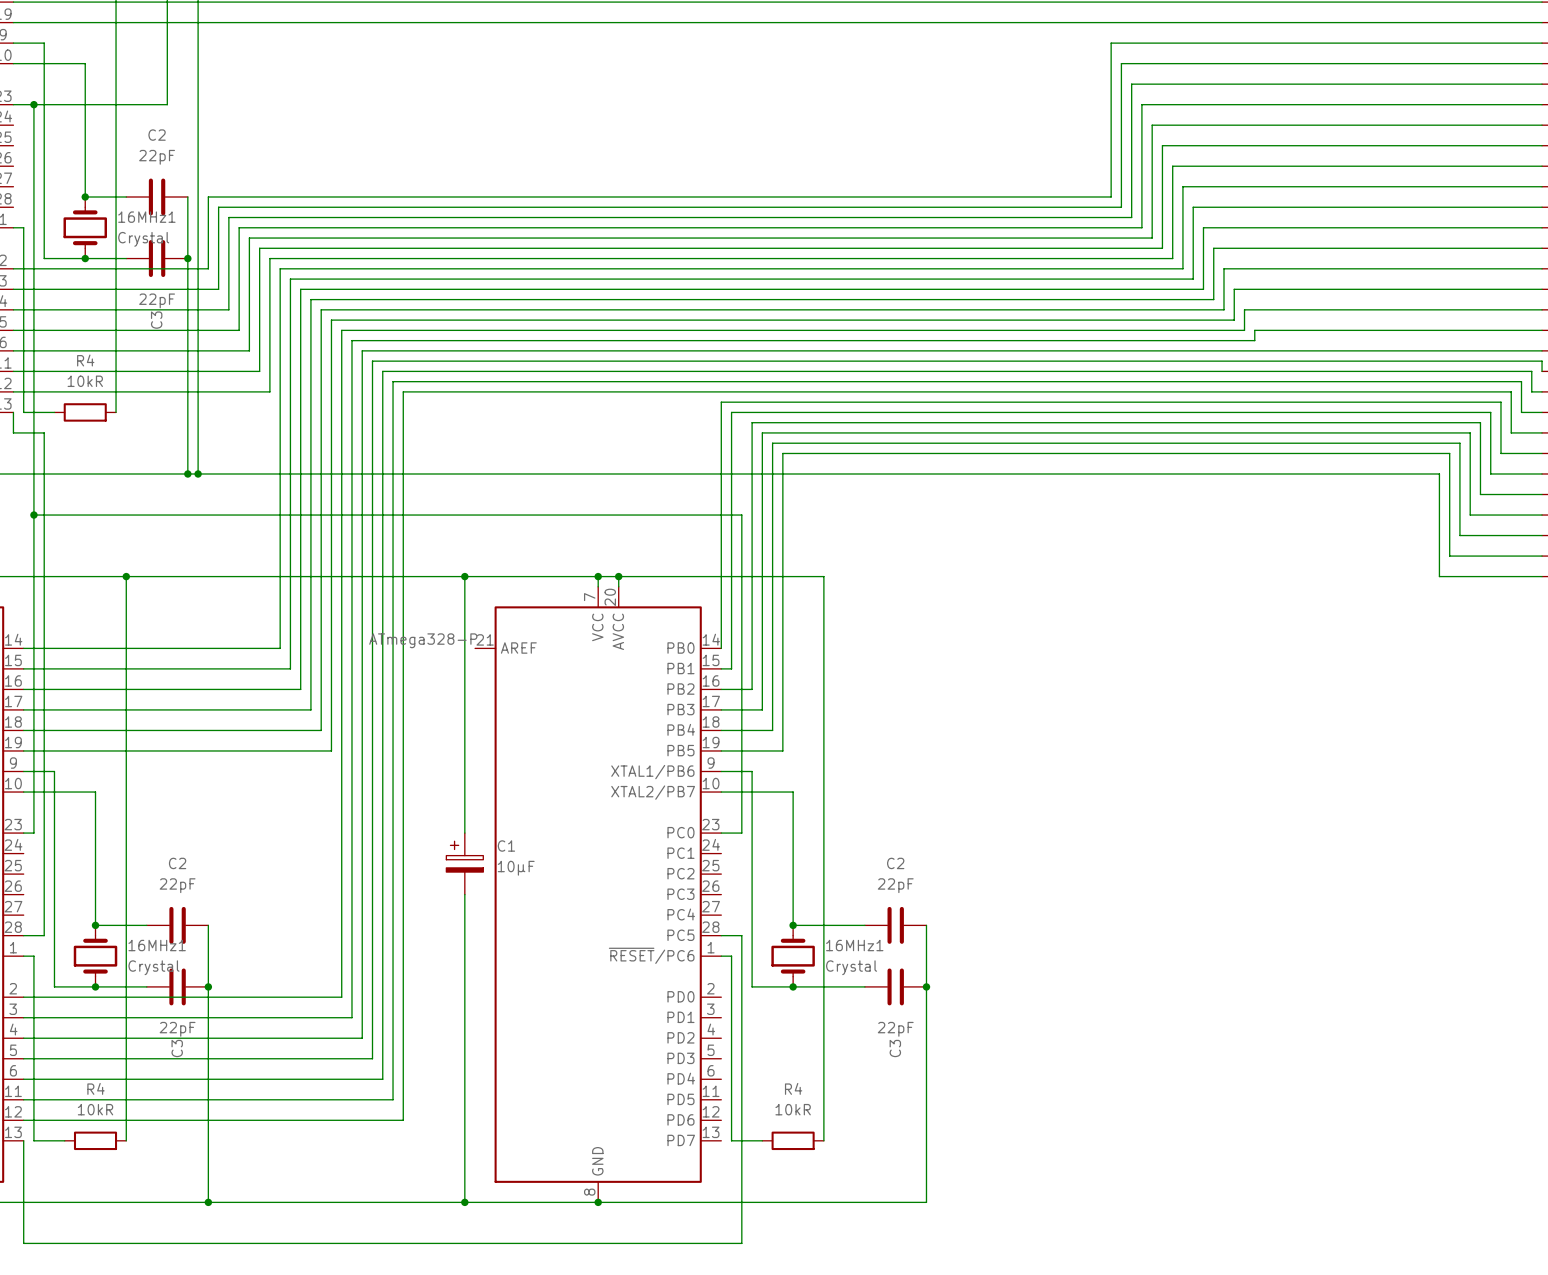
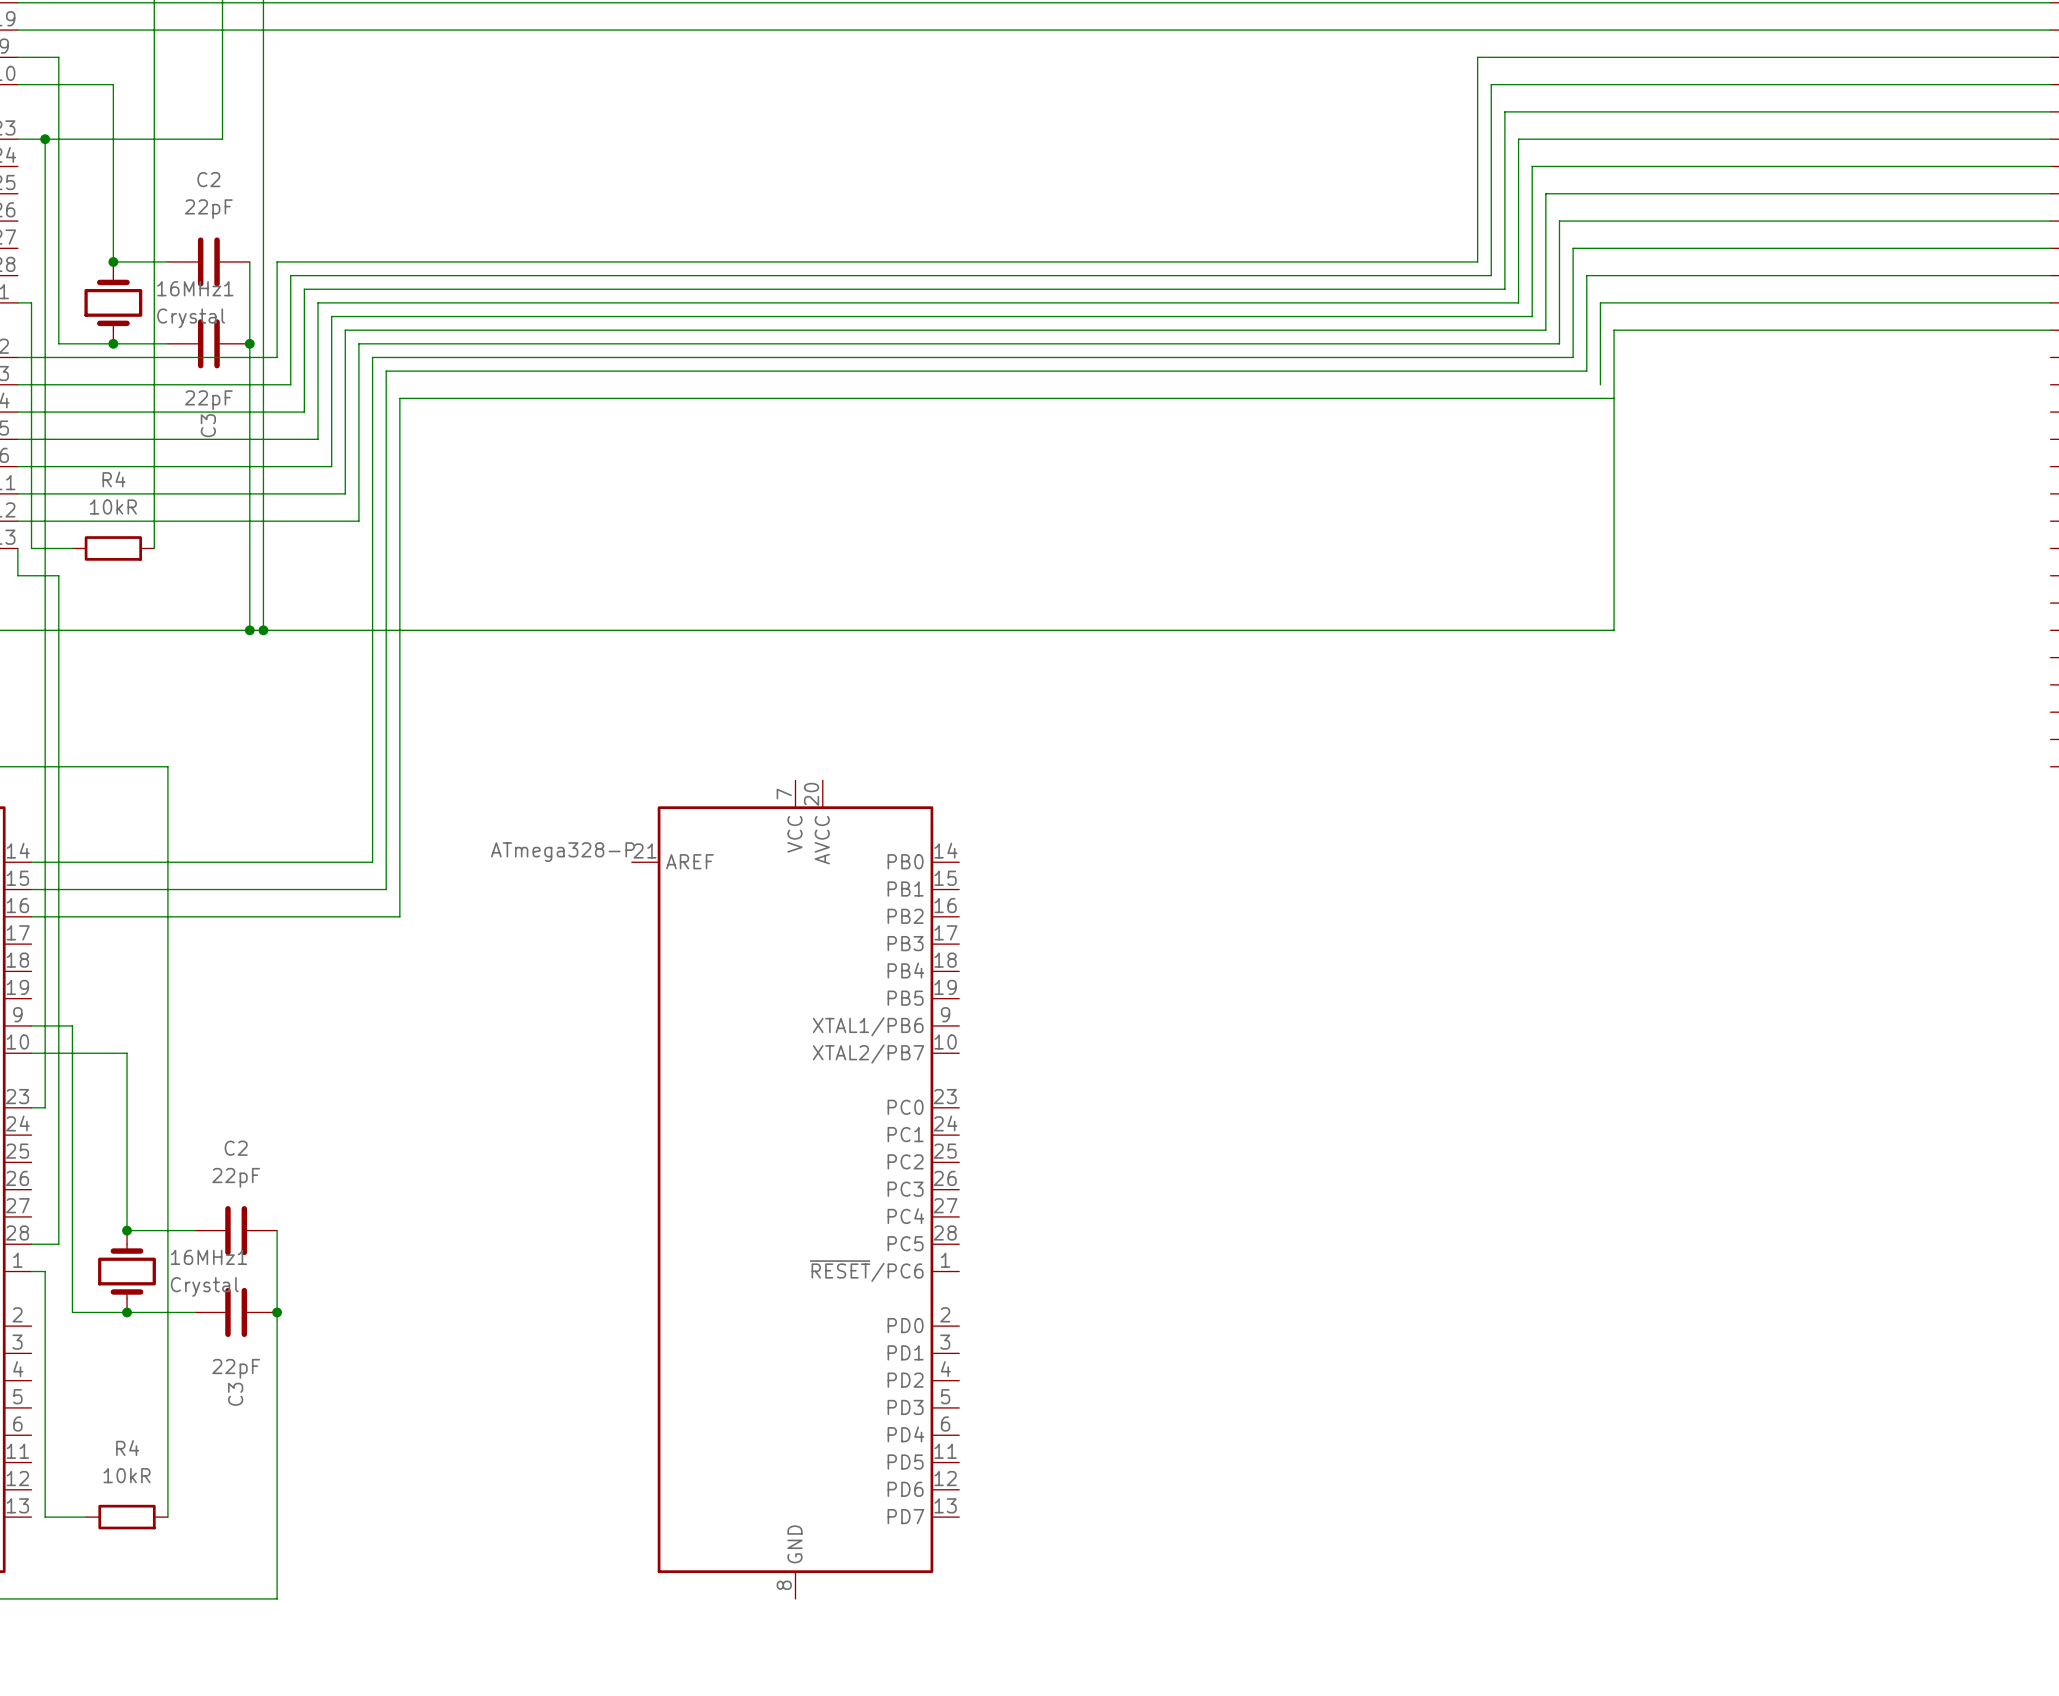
wire: (1542, 268) (1223, 268) (1223, 309) (321, 309) (321, 730) (23, 730) -> none
wire: (1203, 289) (300, 289) (300, 299) -> none
wire: (1542, 289) (1234, 289) (1234, 320) (331, 320) (331, 750) (23, 750) -> none
wire: (310, 299) (310, 709) (23, 709) -> (413, 398) (399, 398)
wire: (1542, 309) (1244, 309) (1244, 330) (341, 330) (341, 997) (23, 997) -> none
wire: (1542, 330) (1254, 330) (1254, 340) (351, 340) (351, 1017) (23, 1017) -> none
wire: (1542, 350) (362, 350) (362, 1038) (23, 1038) -> none
wire: (1542, 371) (1542, 361) (372, 361) (372, 1058) (23, 1058) -> none
wire: (1542, 391) (1531, 391) (1531, 371) (382, 371) (382, 1079) (23, 1079) -> none
wire: (1542, 412) (1521, 412) (1521, 381) (393, 381) (393, 1099) (23, 1099) -> none
wire: (1542, 432) (1511, 432) (1511, 391) (403, 391) (403, 1120) (23, 1120) -> none
wire: (1542, 453) (1500, 453) (1500, 402) (721, 402) (721, 648) -> none
wire: (1213, 473) (1439, 473) (1439, 576) (1542, 576) -> (1614, 630) (1614, 398)
wire: (1542, 473) (1490, 473) (1490, 412) (731, 412) (731, 668) (721, 668) -> none
wire: (1542, 494) (1480, 494) (1480, 422) (752, 422) (752, 689) (721, 689) -> none
wire: (33, 515) (741, 515) (741, 833) (721, 833) -> none
junction: (33, 515) -> none
wire: (1542, 515) (1470, 515) (1470, 432) (762, 432) (762, 709) (721, 709) -> none
wire: (1542, 535) (1459, 535) (1459, 443) (772, 443) (772, 730) (721, 730) -> none
wire: (1542, 556) (1449, 556) (1449, 453) (782, 453) (782, 750) (721, 750) -> none
wire: (126, 576) (823, 576) (823, 1140) -> none
junction: (126, 576) -> none
wire: (464, 576) (464, 833) -> none
junction: (464, 576) -> none
wire: (598, 576) (598, 586) -> none
junction: (598, 576) -> none
wire: (618, 576) (618, 586) -> none
junction: (618, 576) -> none
wire: (721, 771) (752, 771) (752, 986) (864, 986) -> none
wire: (721, 792) (793, 792) (793, 925) (864, 925) -> none
C1: 10µF (464, 863) -> none
wire: (464, 894) (464, 1202) -> none
junction: (793, 925) -> none
C2: 22pF (895, 925) -> none
wire: (926, 925) (926, 1202) (208, 1202) -> none
wire: (721, 935) (741, 935) (741, 1243) (23, 1243) (23, 1140) -> none
wire: (721, 956) (731, 956) (731, 1140) (762, 1140) -> none
16MHz1: Crystal (793, 956) -> none
junction: (793, 986) -> none
C3: 22pF (895, 986) -> none
junction: (926, 986) -> none
R4: 10kR (793, 1140) -> none
junction: (208, 1202) -> none
junction: (464, 1202) -> none
junction: (598, 1202) -> none

